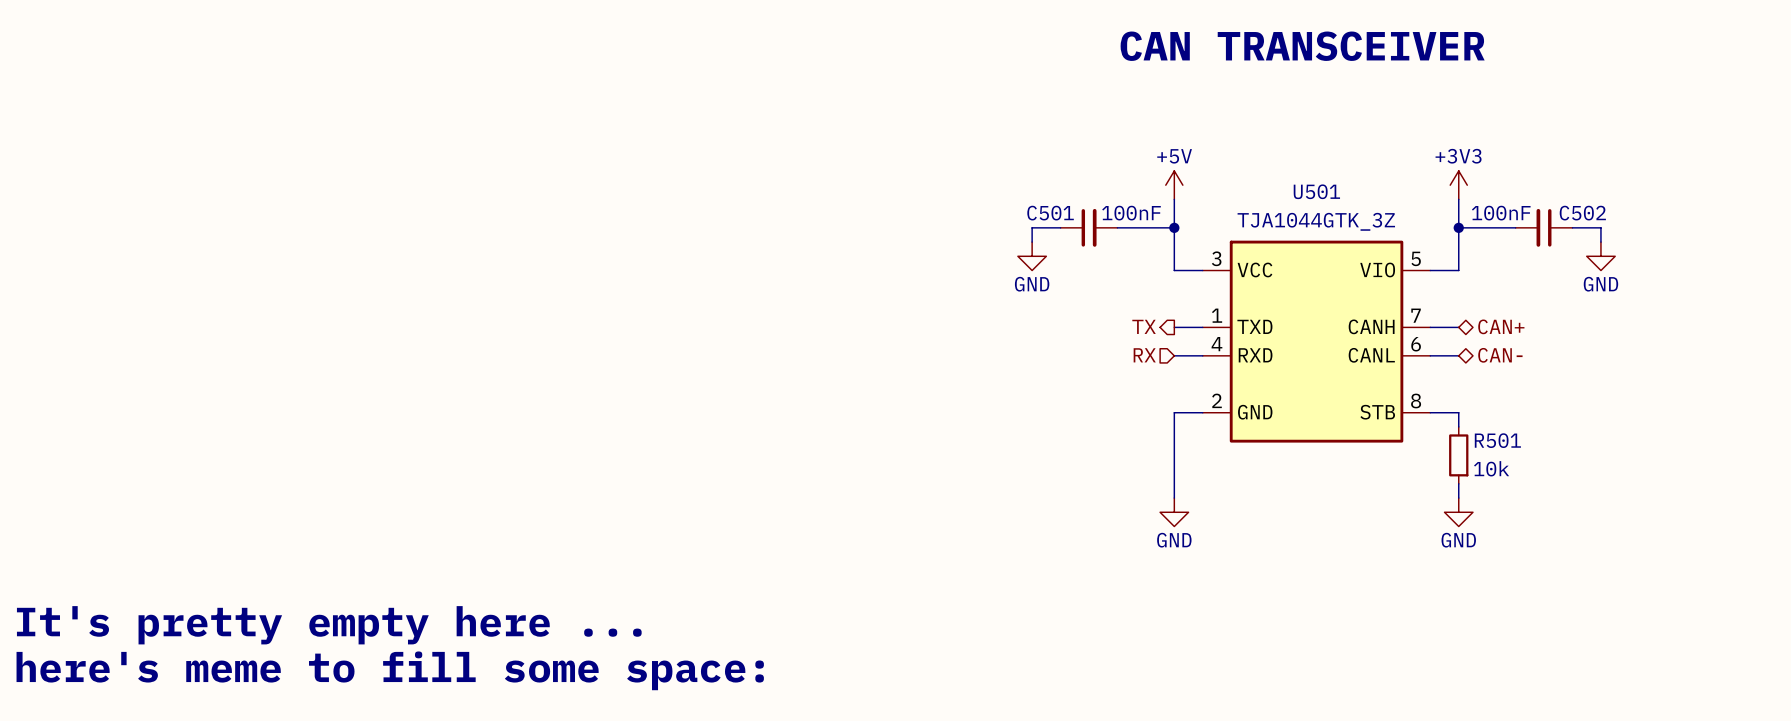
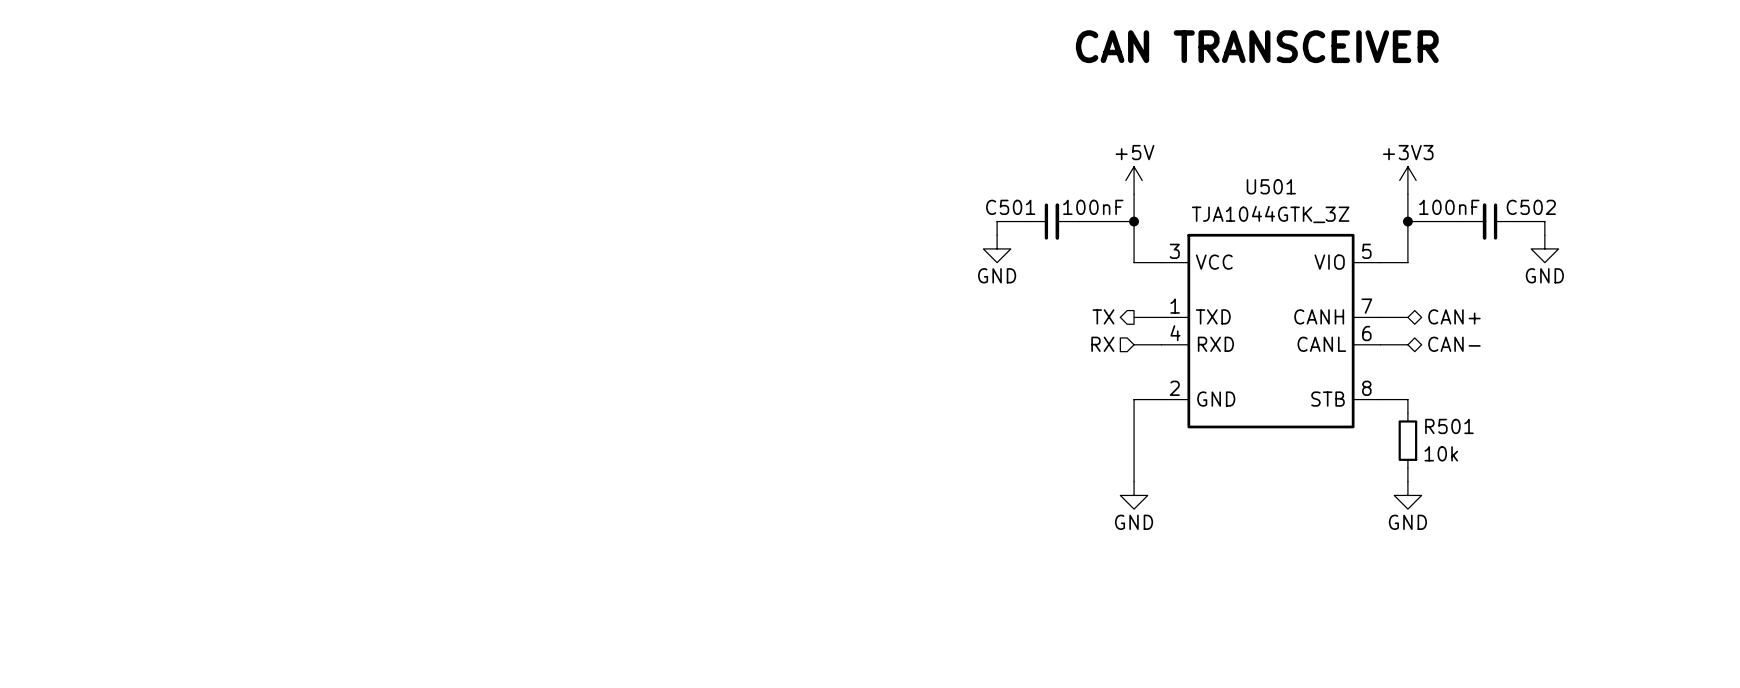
text: It's pretty empty here ... (329, 625) -> none
text: here's meme to fill some space: (390, 670) -> none

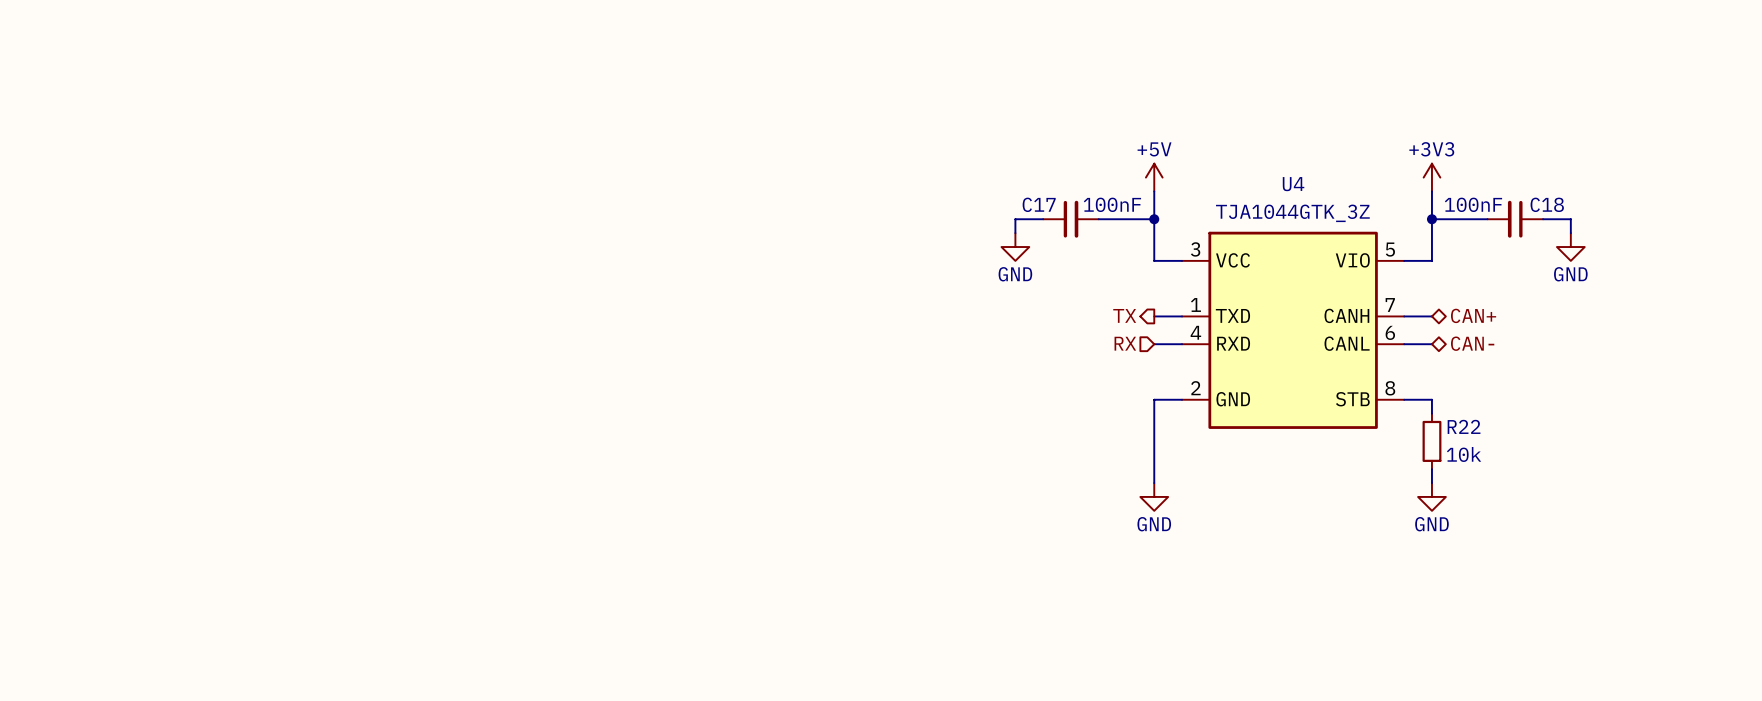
text: CAN TRANSCEIVER (1257, 46) -> none
U501 name: U501 (1271, 186) -> U4 (1293, 184)
C501 name: C501 (1010, 207) -> C17 (1039, 204)
C502 name: C502 (1531, 207) -> C18 (1547, 204)
R501 name: R501 (1449, 426) -> R22 (1464, 426)

